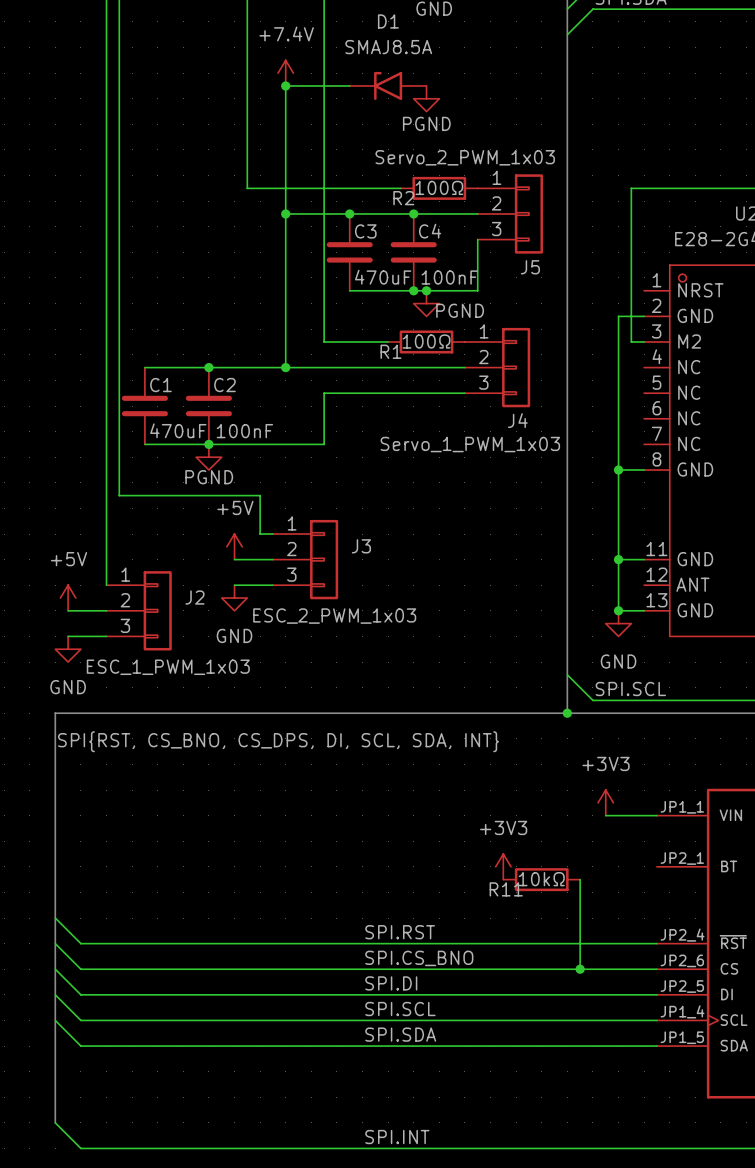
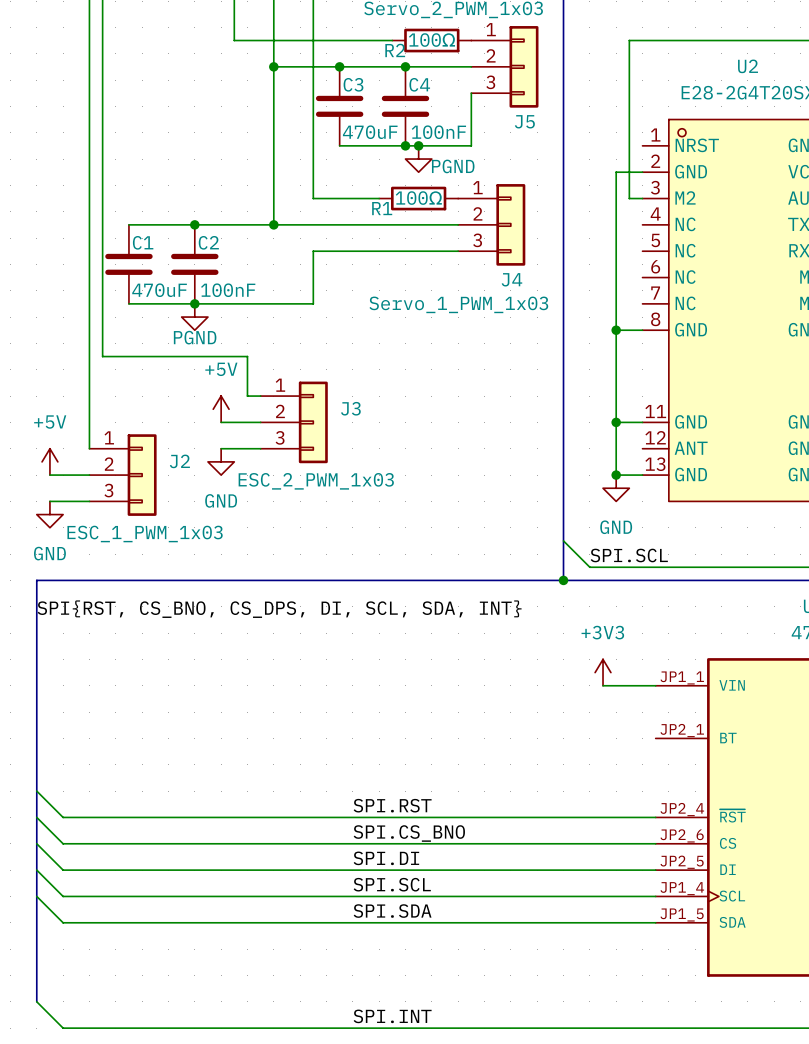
power symbol: +3V3 (503, 866) -> none
R11: 10kΩ (541, 879) -> none
wire: (580, 879) (580, 969) -> none
junction: (580, 969) -> none

